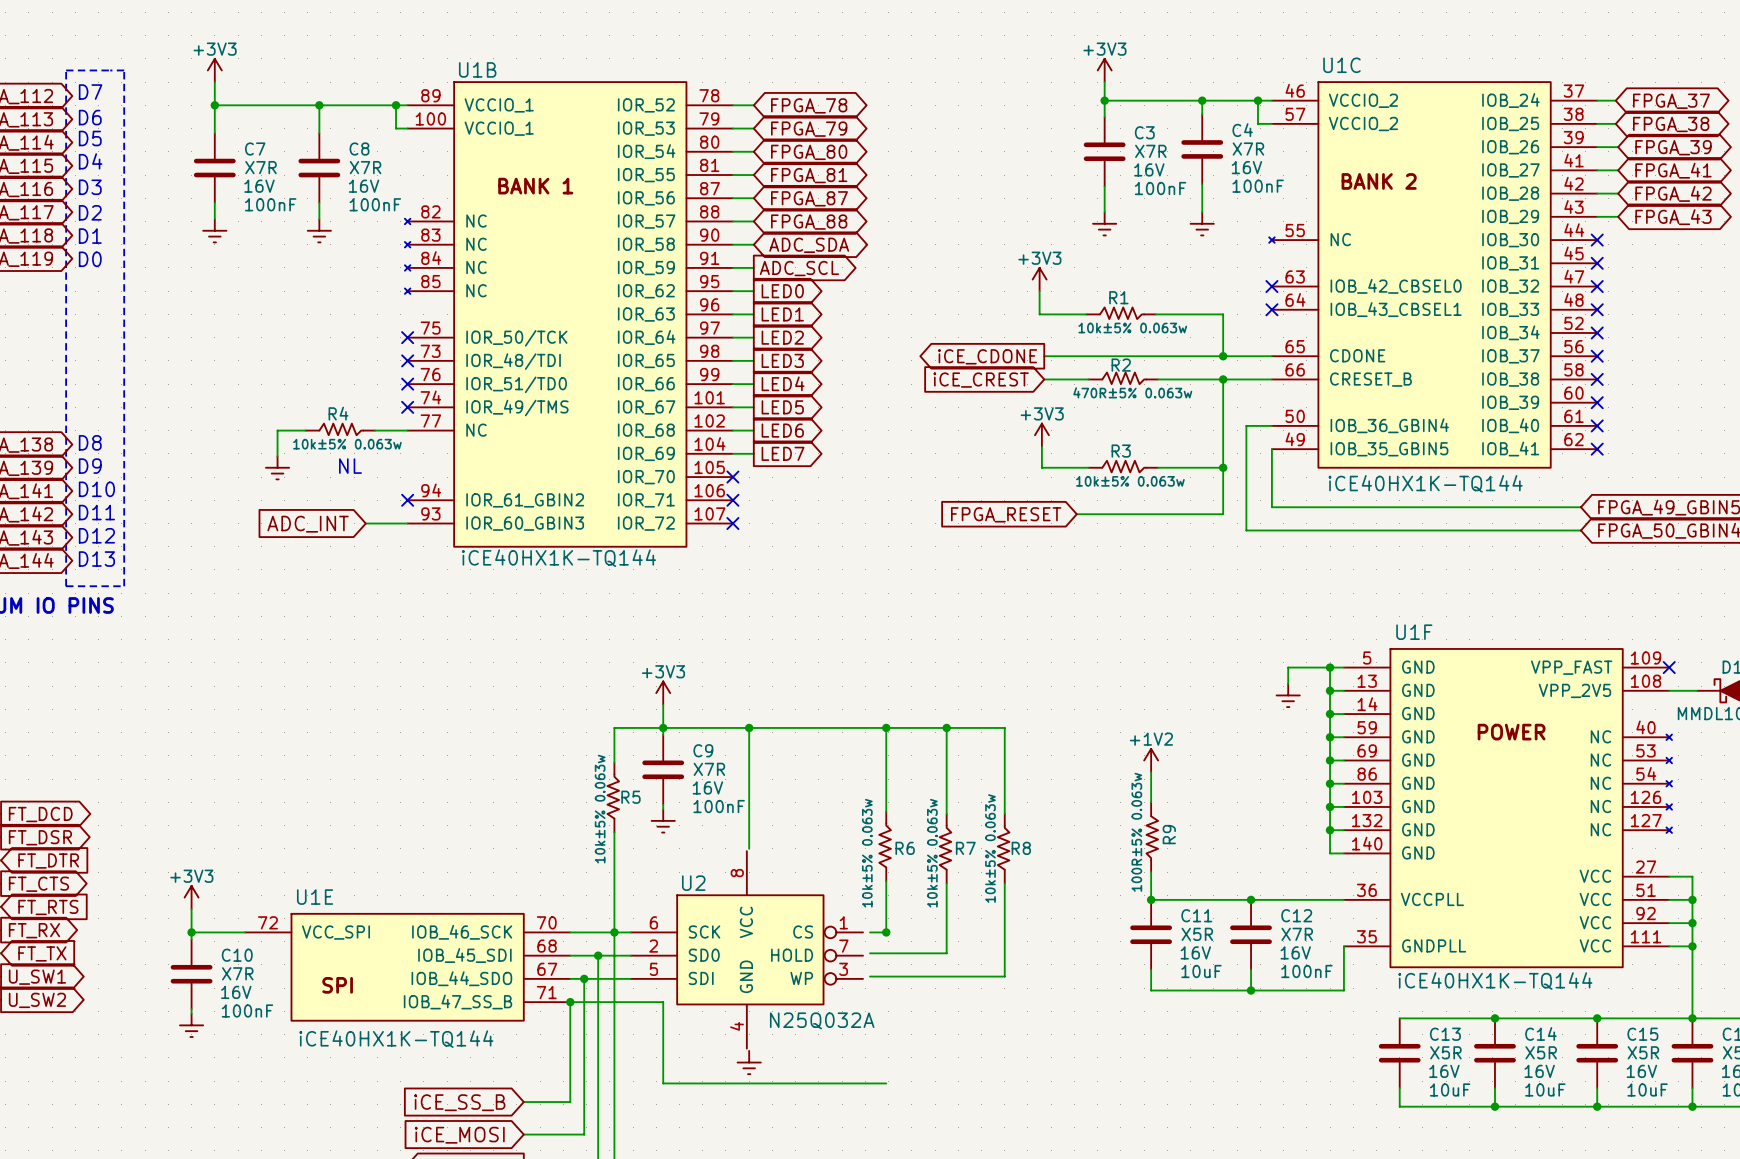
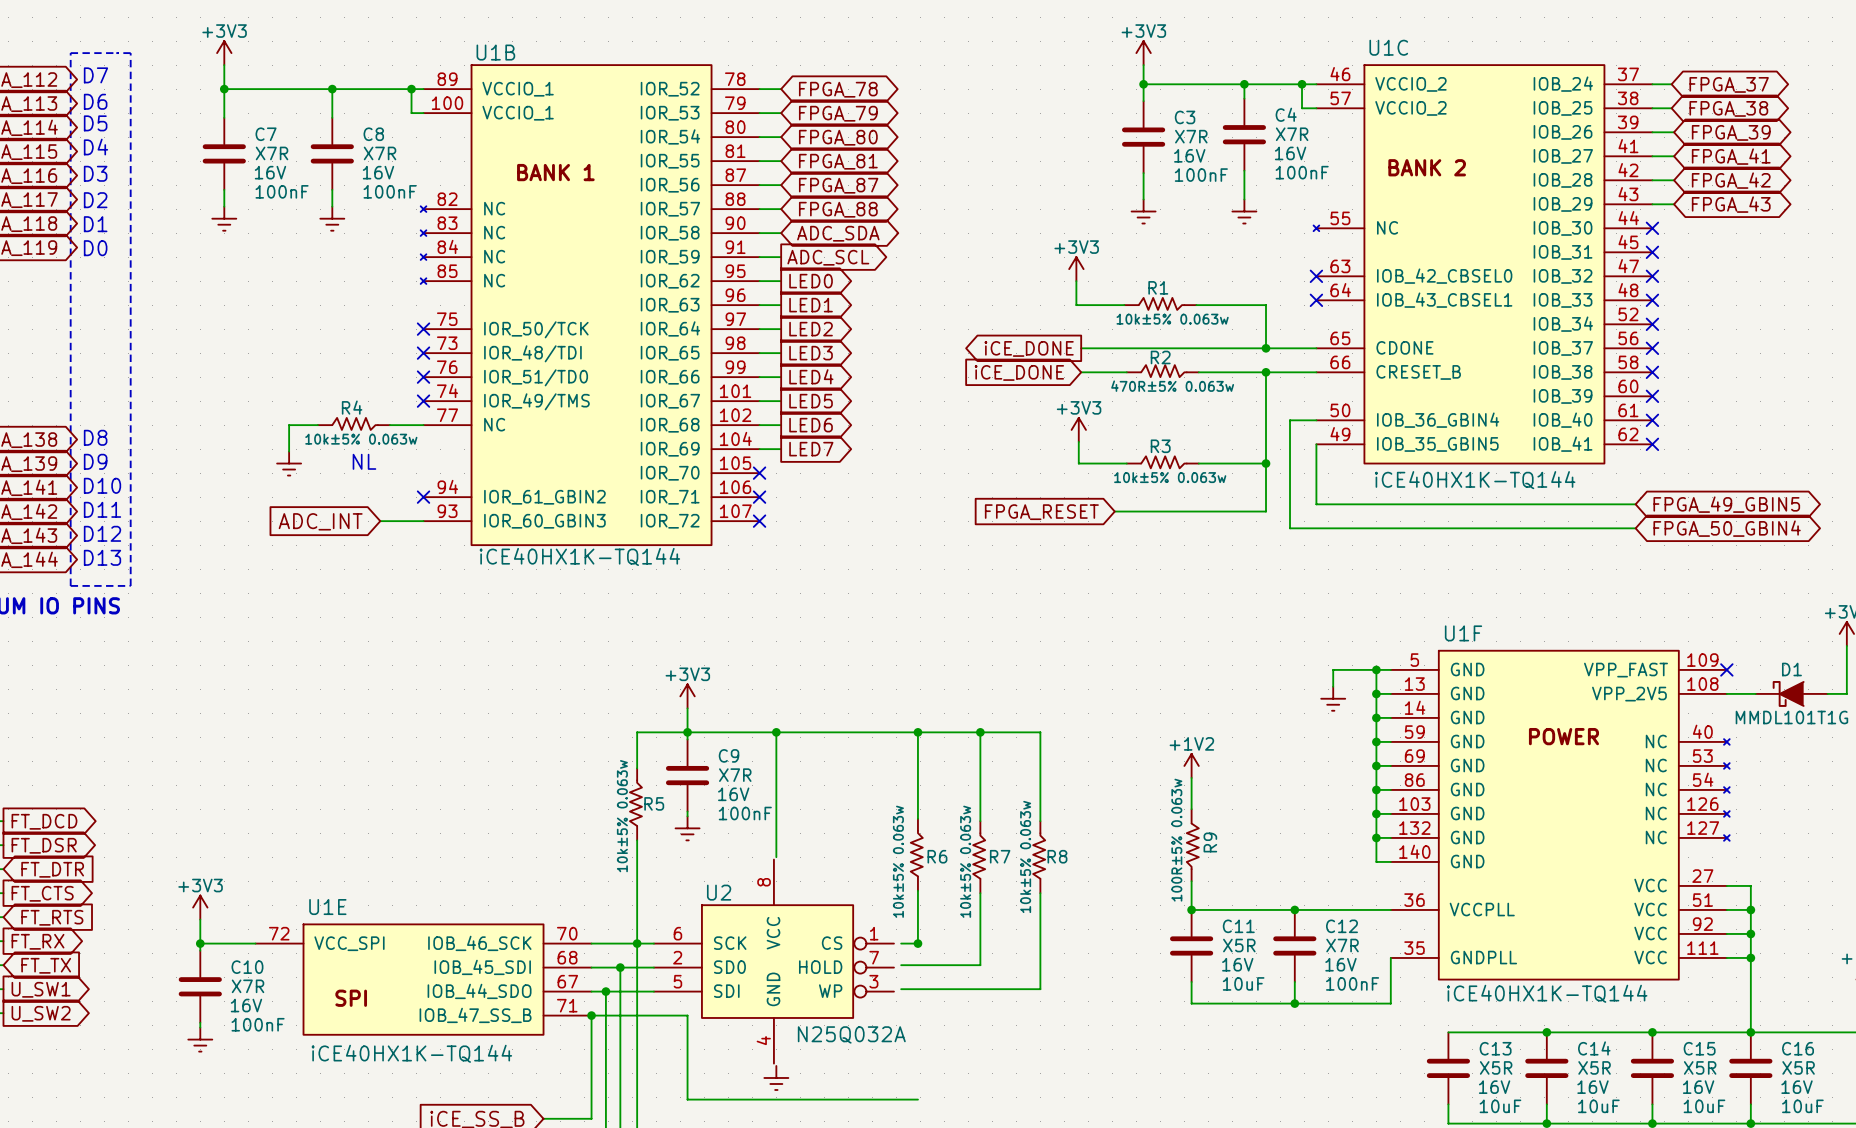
global label: iCE_CDONE (987, 356) -> iCE_DONE (1029, 348)
global label: iCE_CREST (981, 380) -> iCE_DONE (1019, 372)

